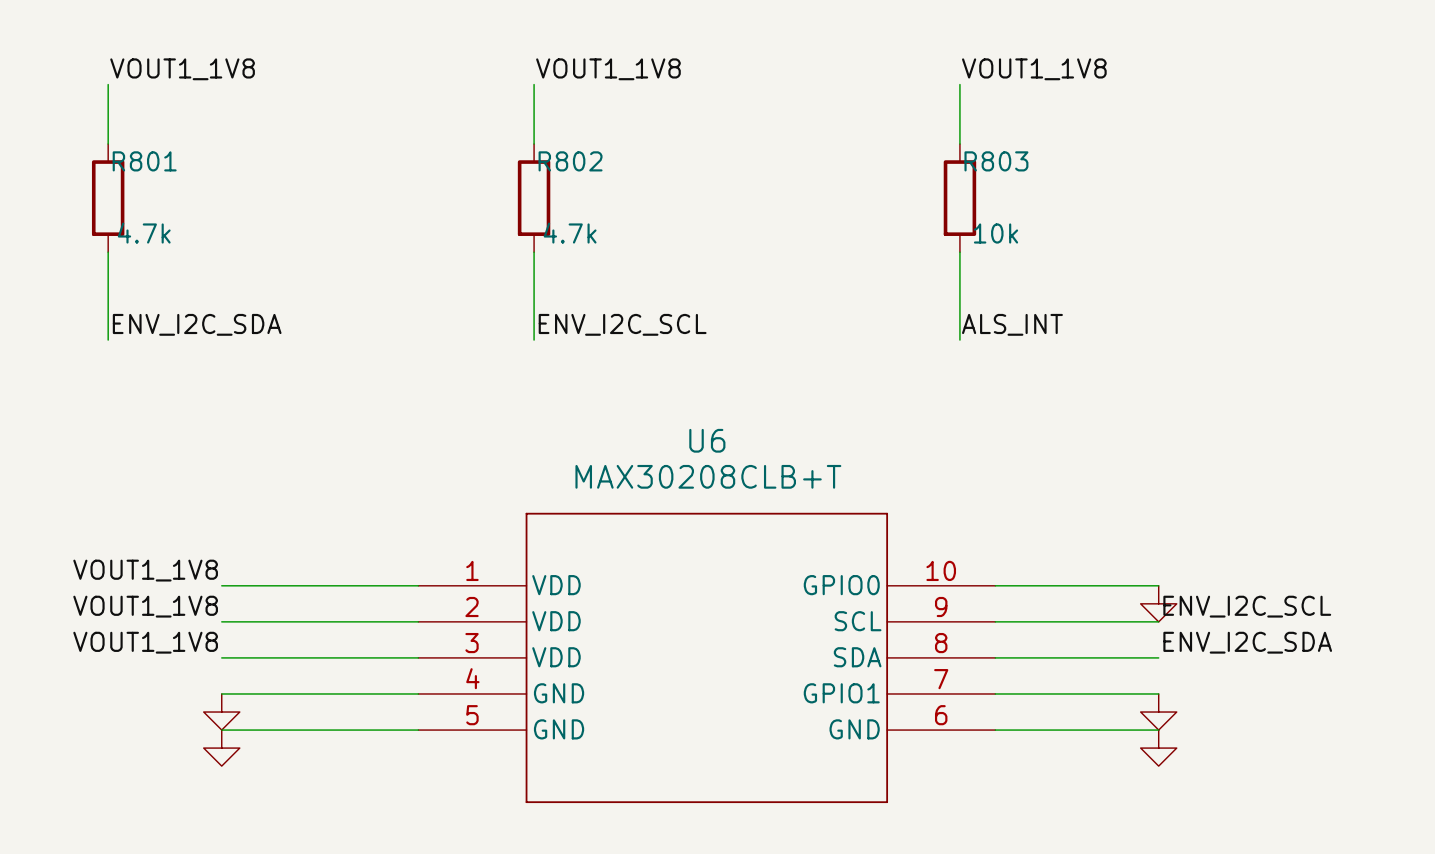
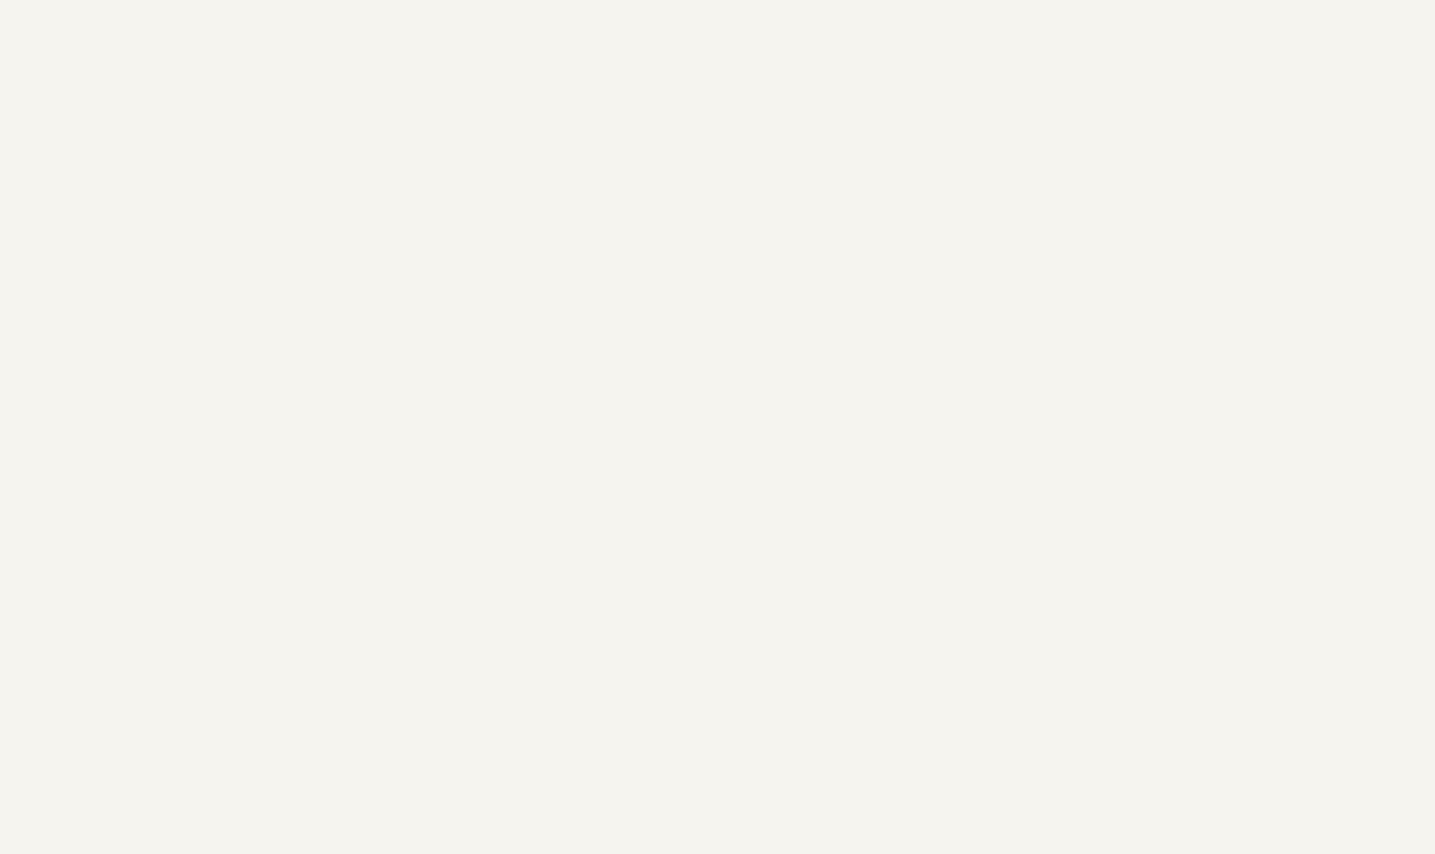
label: VOUT1_1V8 (182, 69) -> none
label: VOUT1_1V8 (608, 69) -> none
label: VOUT1_1V8 (1034, 69) -> none
wire: (108, 84) (108, 144) -> none
wire: (534, 84) (534, 144) -> none
wire: (959, 84) (959, 144) -> none
R801: 4.7k (108, 198) -> none
R802: 4.7k (534, 198) -> none
R803: 10k (959, 198) -> none
wire: (108, 252) (108, 340) -> none
wire: (534, 252) (534, 340) -> none
wire: (959, 252) (959, 340) -> none
label: ENV_I2C_SDA (197, 324) -> none
label: ENV_I2C_SCL (622, 324) -> none
label: ALS_INT (1012, 324) -> none
label: VOUT1_1V8 (145, 570) -> none
wire: (221, 585) (418, 585) -> none
wire: (995, 585) (1158, 585) -> none
power symbol: (1158, 603) -> none
label: VOUT1_1V8 (145, 606) -> none
label: ENV_I2C_SCL (1247, 606) -> none
wire: (221, 621) (418, 621) -> none
wire: (995, 621) (1158, 621) -> none
label: VOUT1_1V8 (145, 642) -> none
label: ENV_I2C_SDA (1247, 642) -> none
wire: (221, 657) (418, 657) -> none
U6: MAX30208CLB+T (706, 657) -> none
wire: (995, 657) (1158, 657) -> none
wire: (221, 693) (418, 693) -> none
wire: (995, 693) (1158, 693) -> none
power symbol: (221, 712) -> none
power symbol: (1158, 712) -> none
wire: (221, 730) (418, 730) -> none
wire: (995, 730) (1158, 730) -> none
power symbol: (221, 748) -> none
power symbol: (1158, 748) -> none

